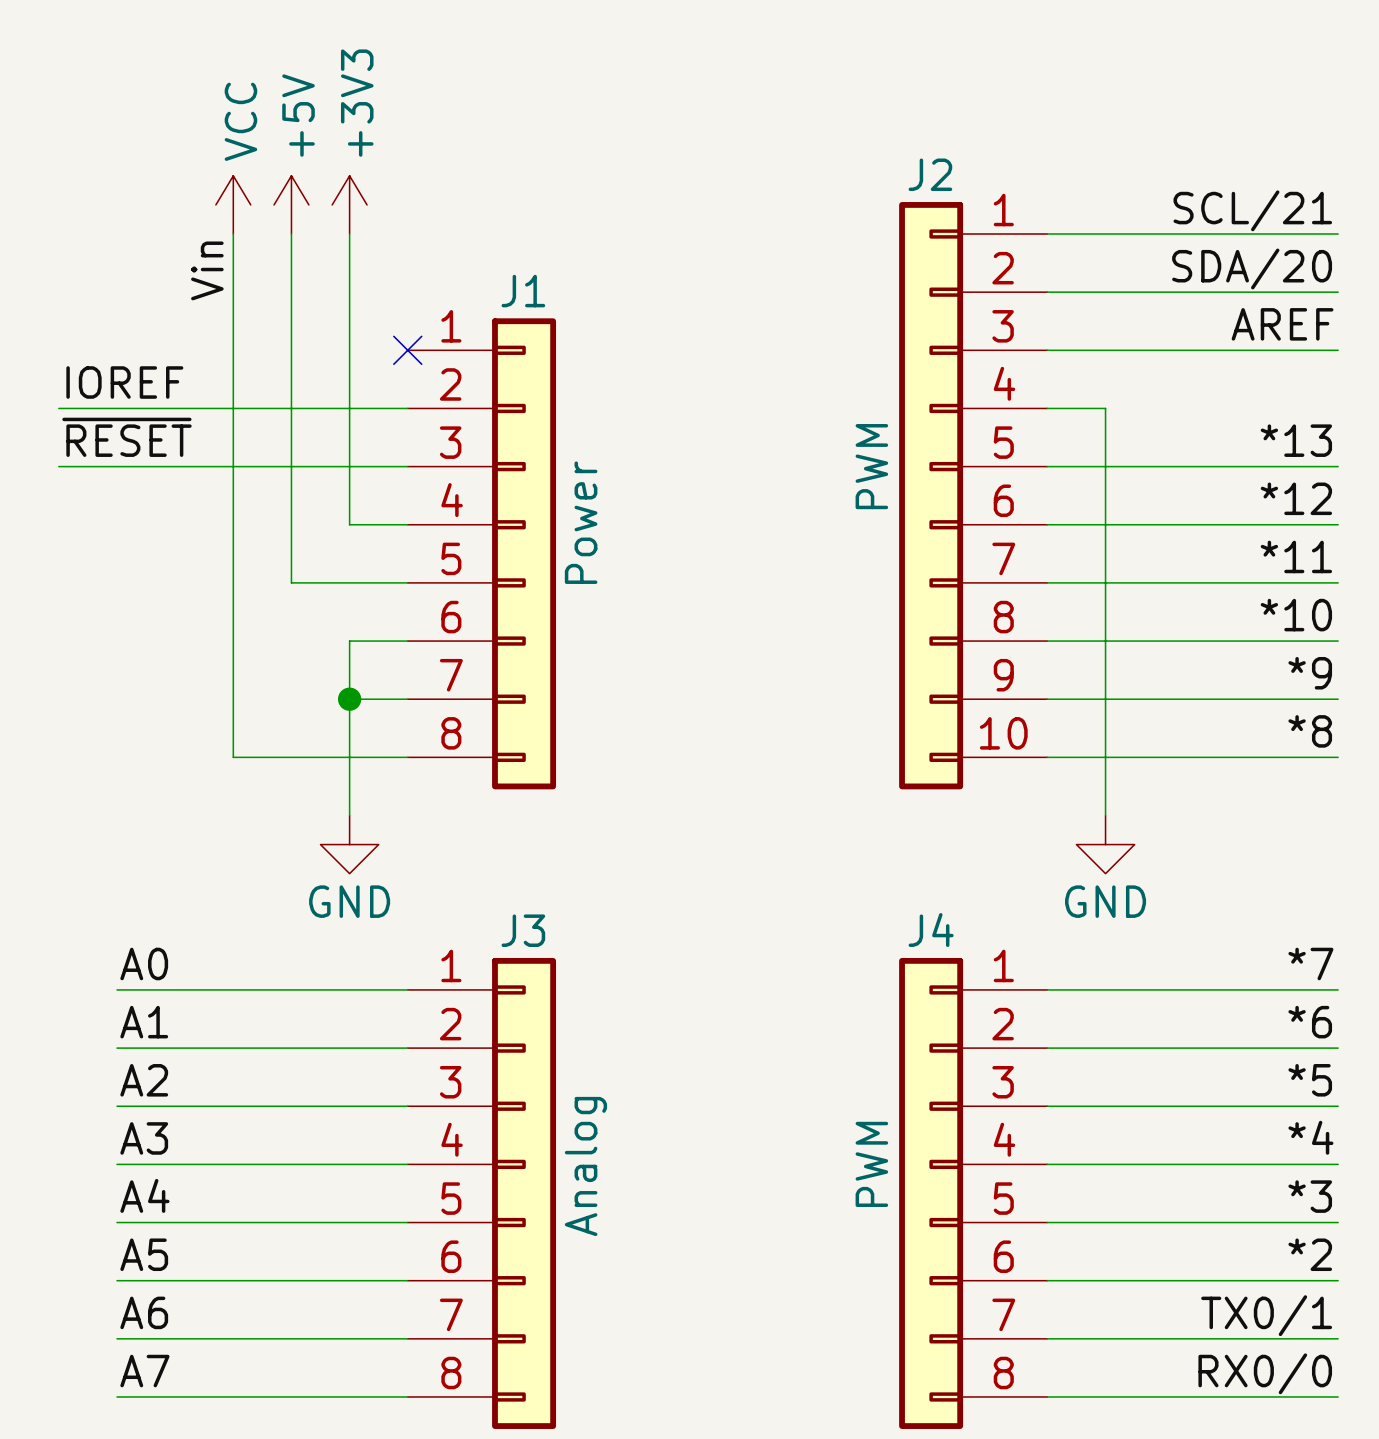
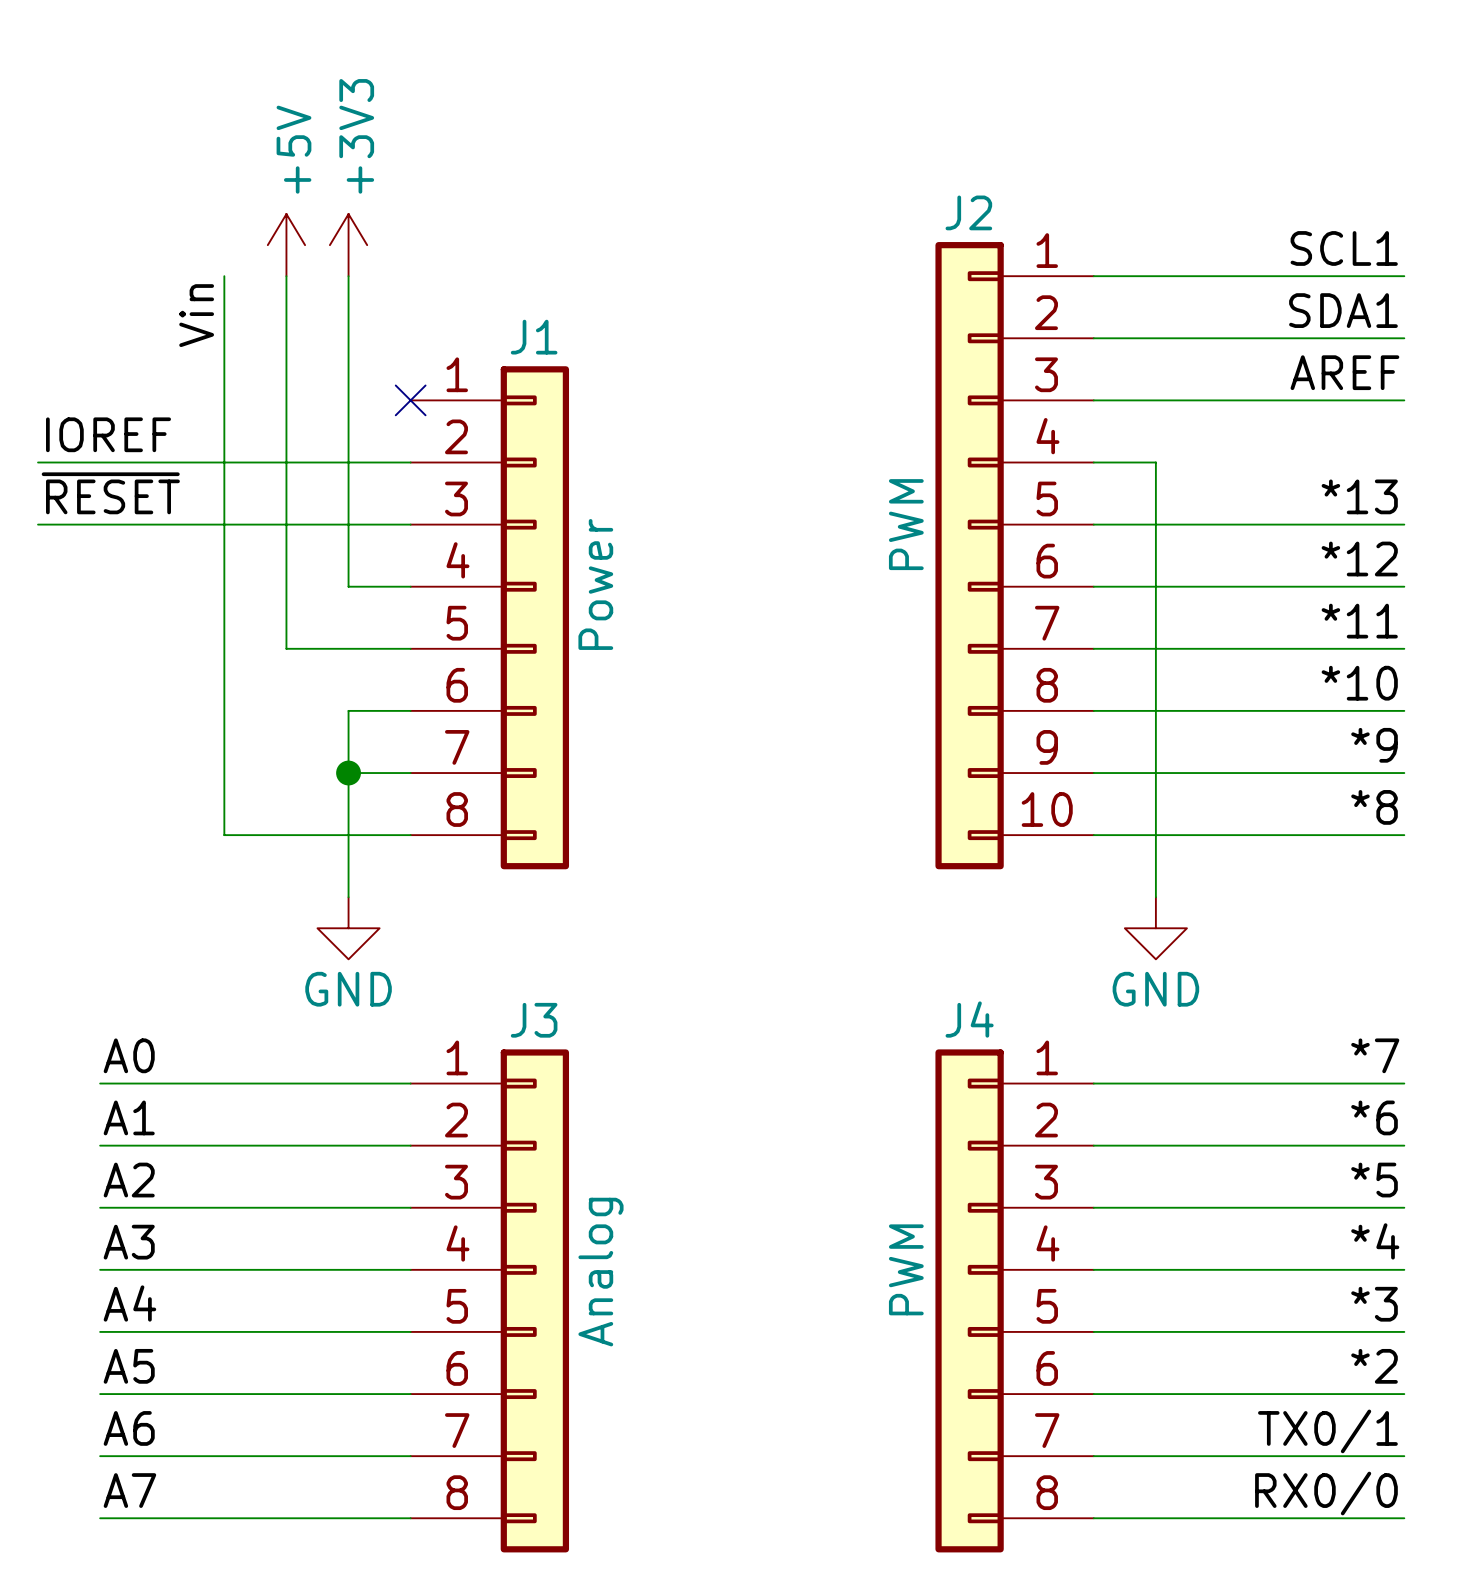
power symbol: VCC (233, 204) -> none
label: SCL/21 (1252, 210) -> SCL1 (1344, 248)
label: SDA/20 (1252, 268) -> SDA1 (1343, 310)

